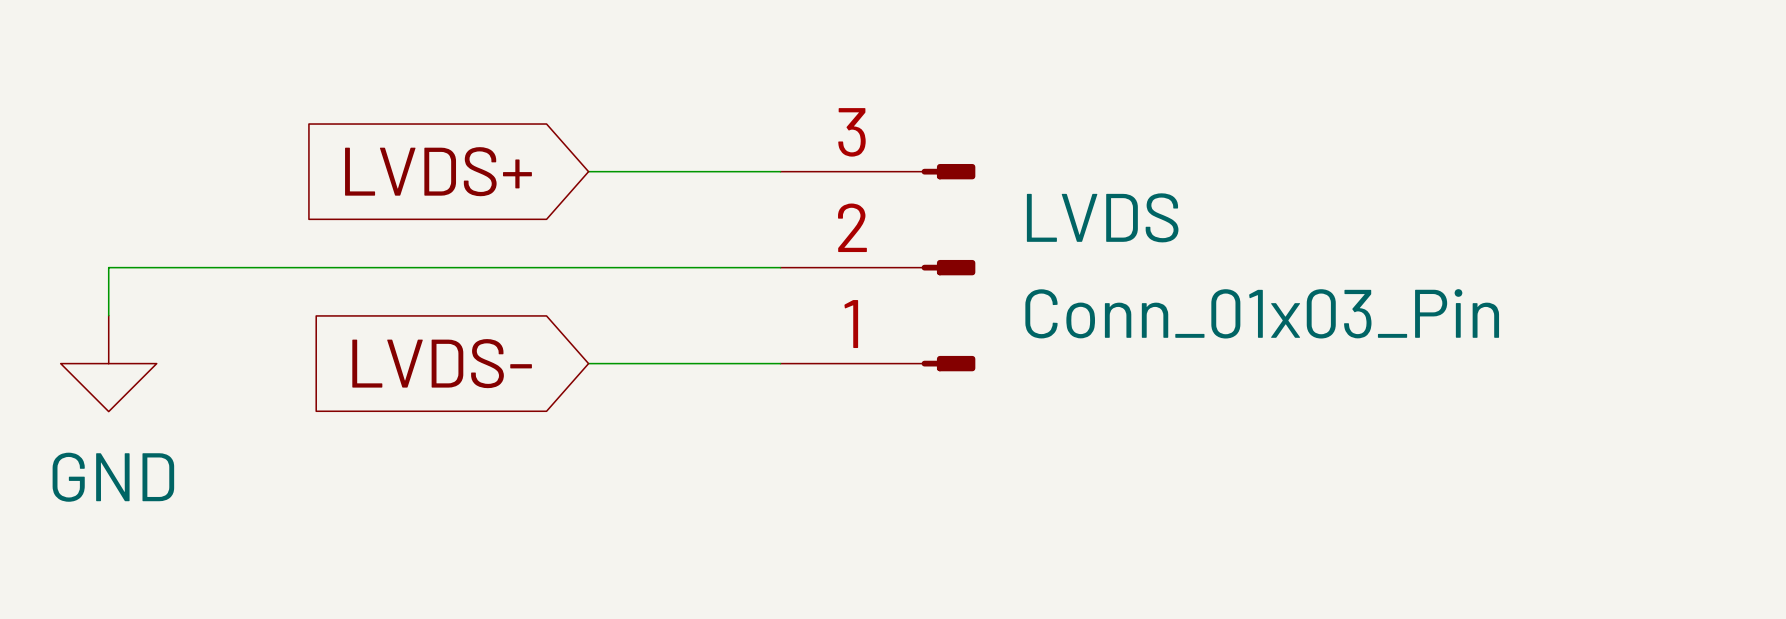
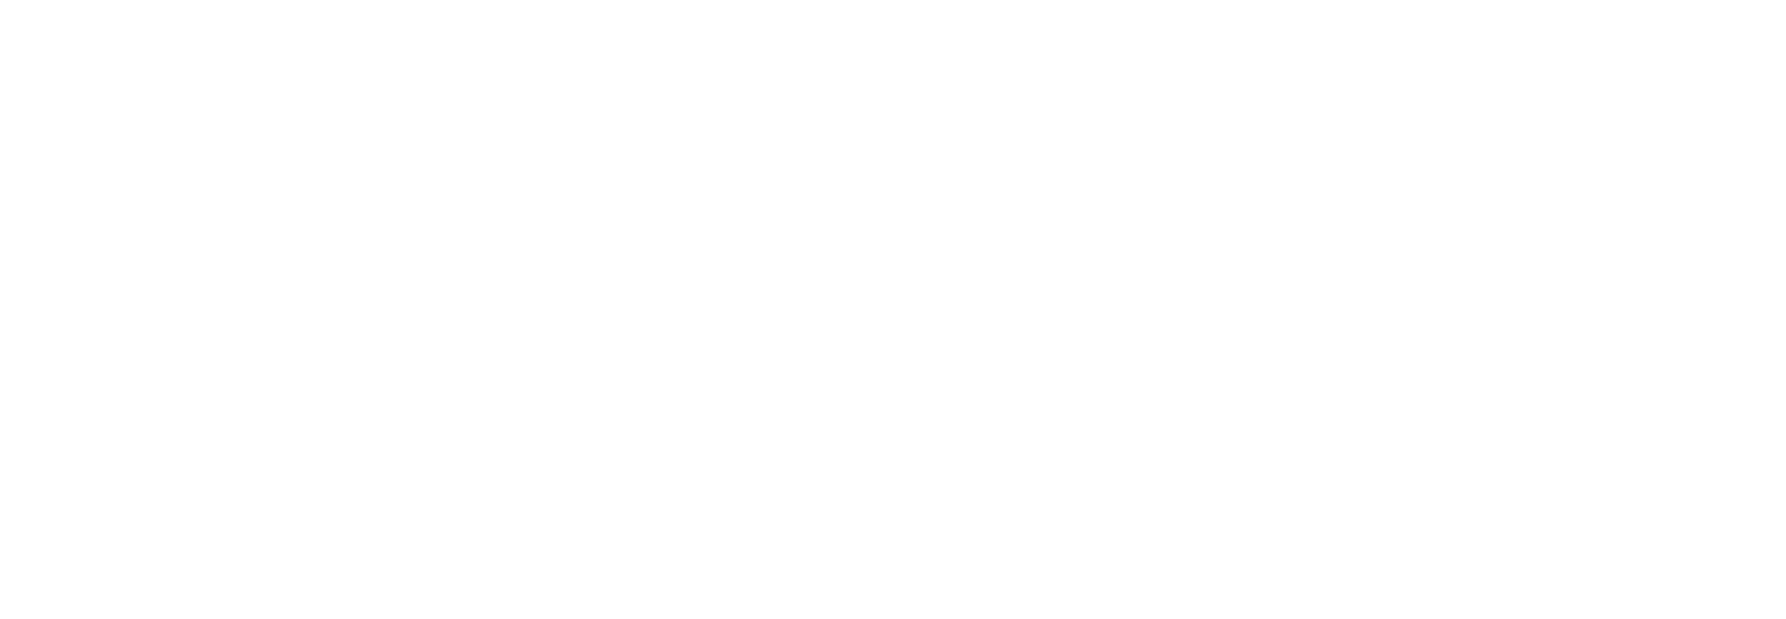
global label: LVDS+ (438, 171) -> none
wire: (588, 171) (780, 171) -> none
wire: (780, 267) (108, 267) (108, 315) -> none
LVDS: Conn_01x03_Pin (877, 267) -> none
power symbol: GND (108, 363) -> none
global label: LVDS- (442, 363) -> none
wire: (588, 363) (780, 363) -> none

